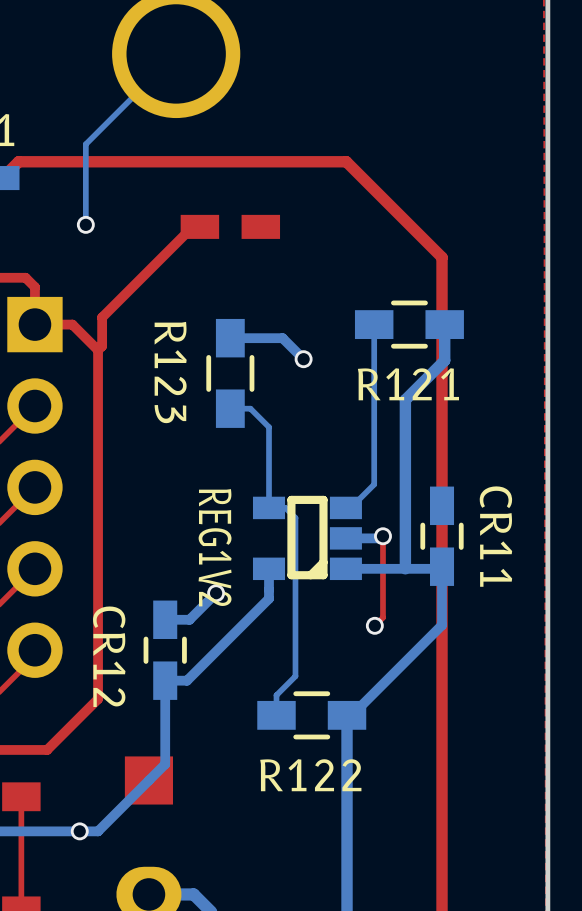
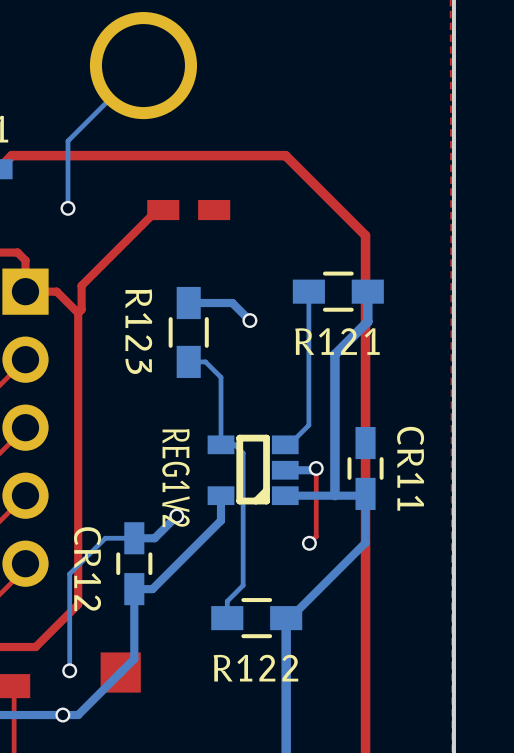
bottom track: none -> (134, 538) (105, 538) (69, 573) (69, 670)
via: none -> (69, 670)

